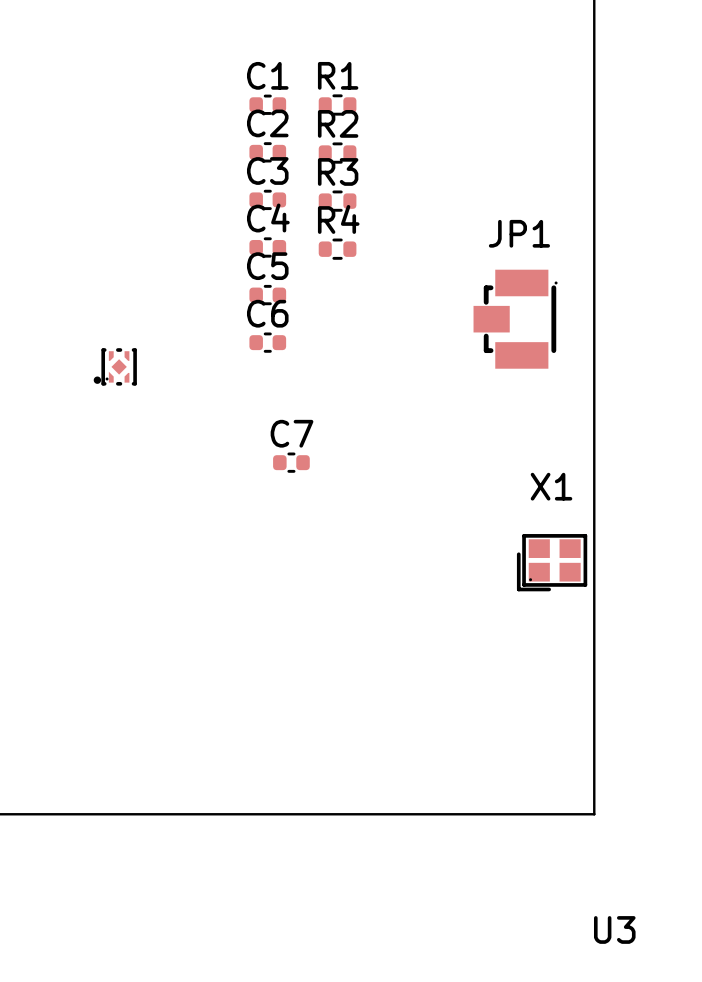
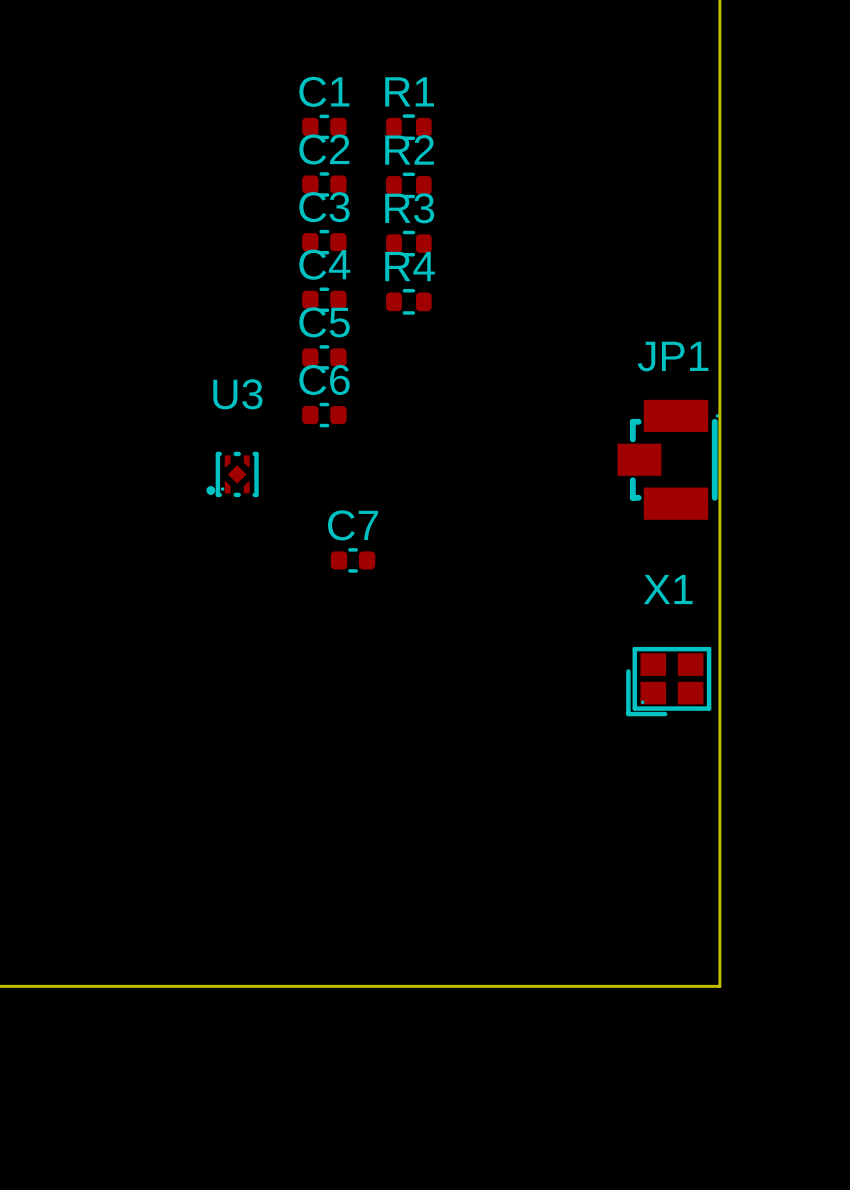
JP1 position: (515, 319) -> (668, 459)
U3 position: (115, 366) -> (232, 474)
U3 name position: U3 (614, 929) -> U3 (237, 394)

